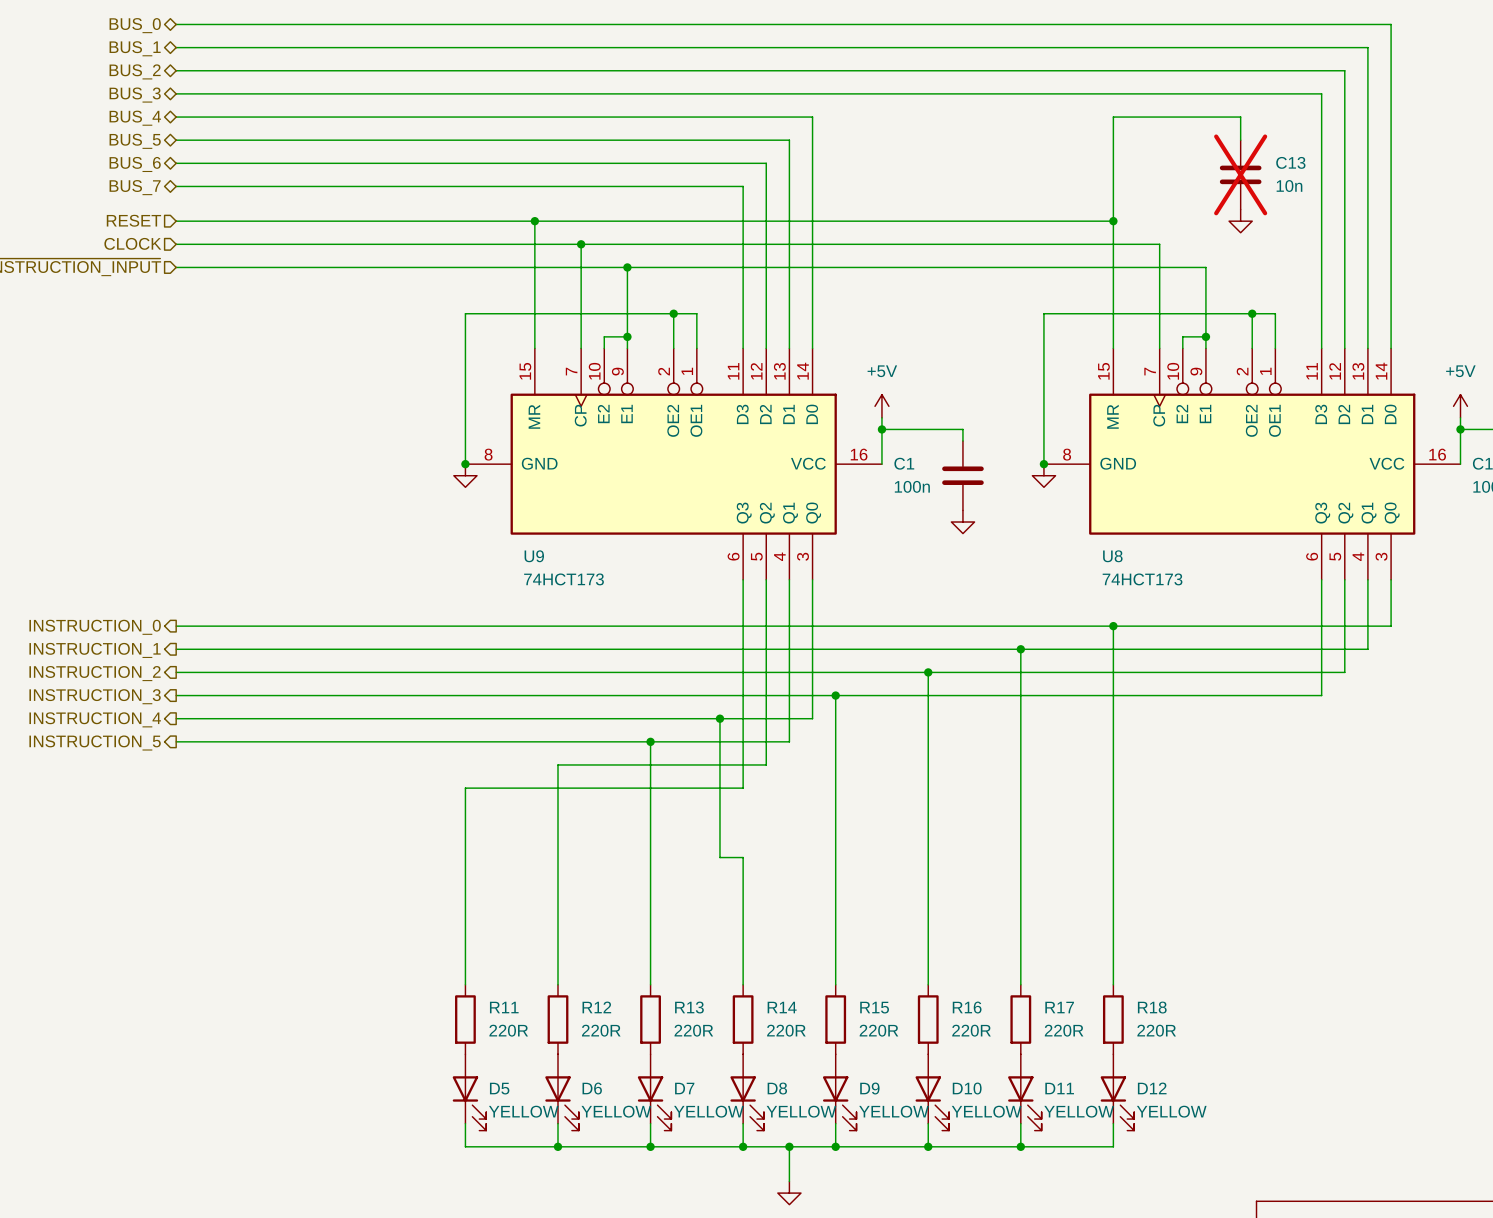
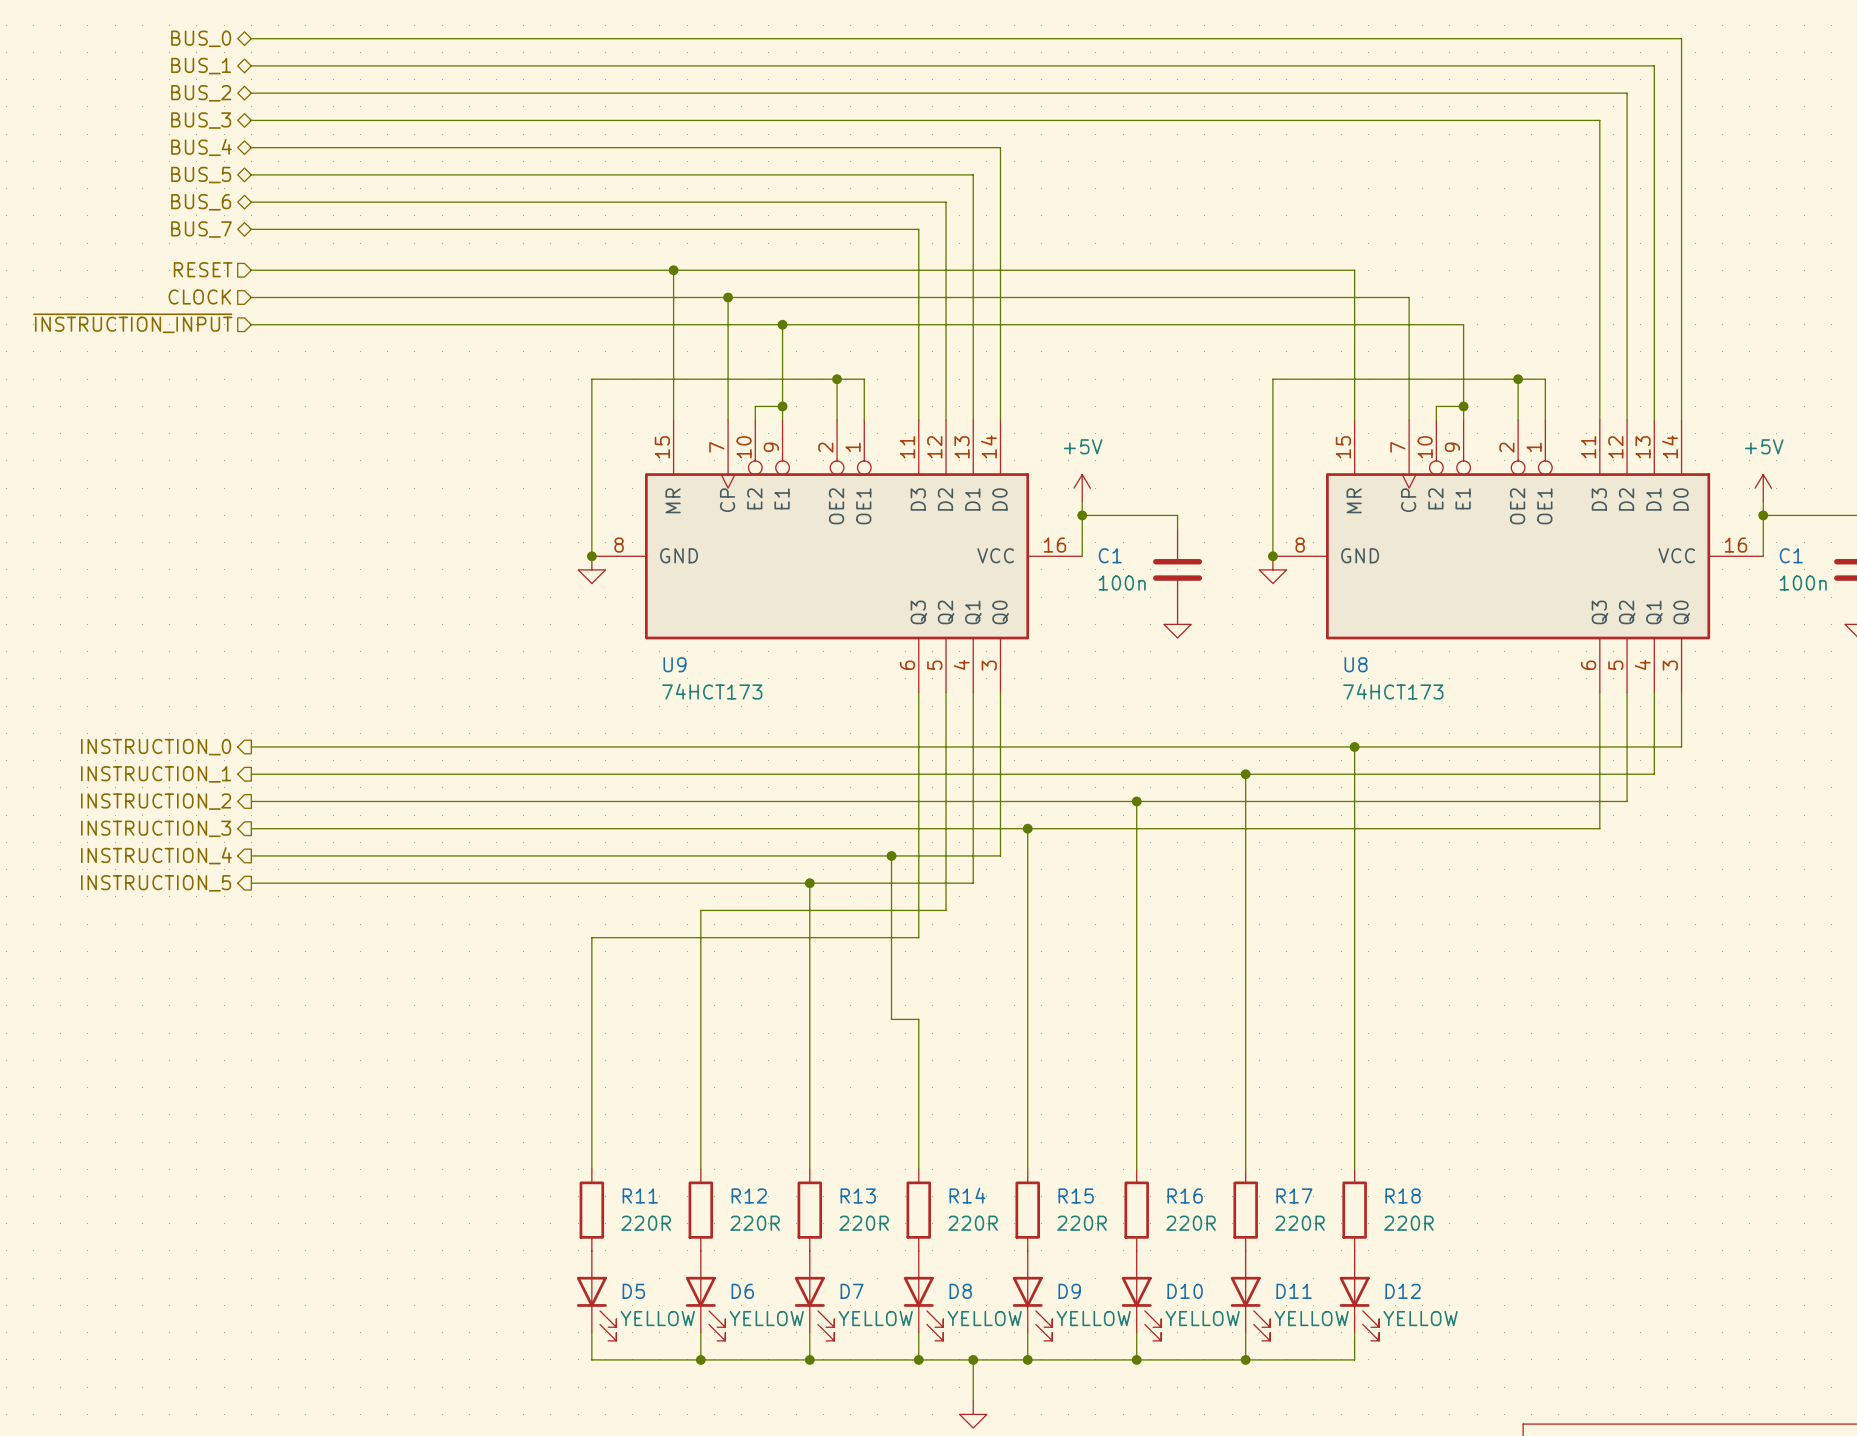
wire: (1240, 140) (1240, 117) (1113, 117) (1113, 221) -> none
C13: 10n (1240, 174) -> none
junction: (1113, 221) -> none
power symbol: (1240, 221) -> none

